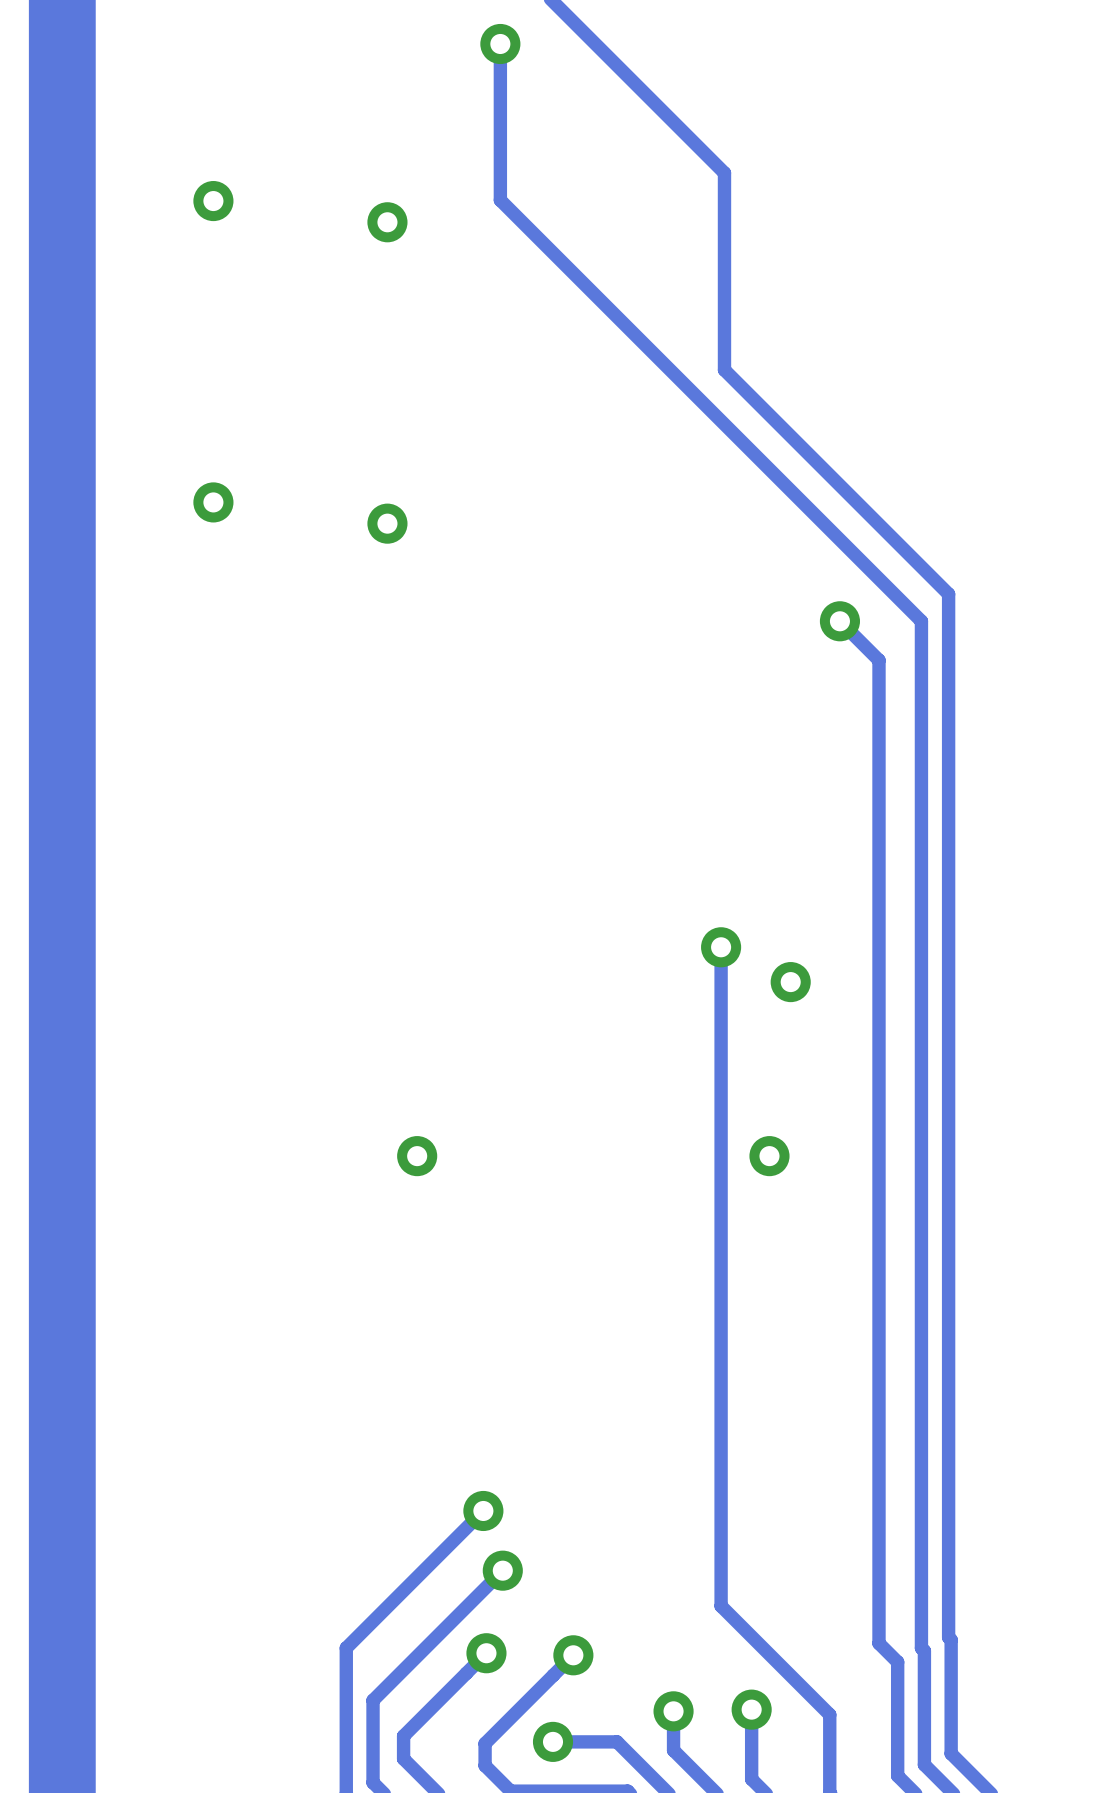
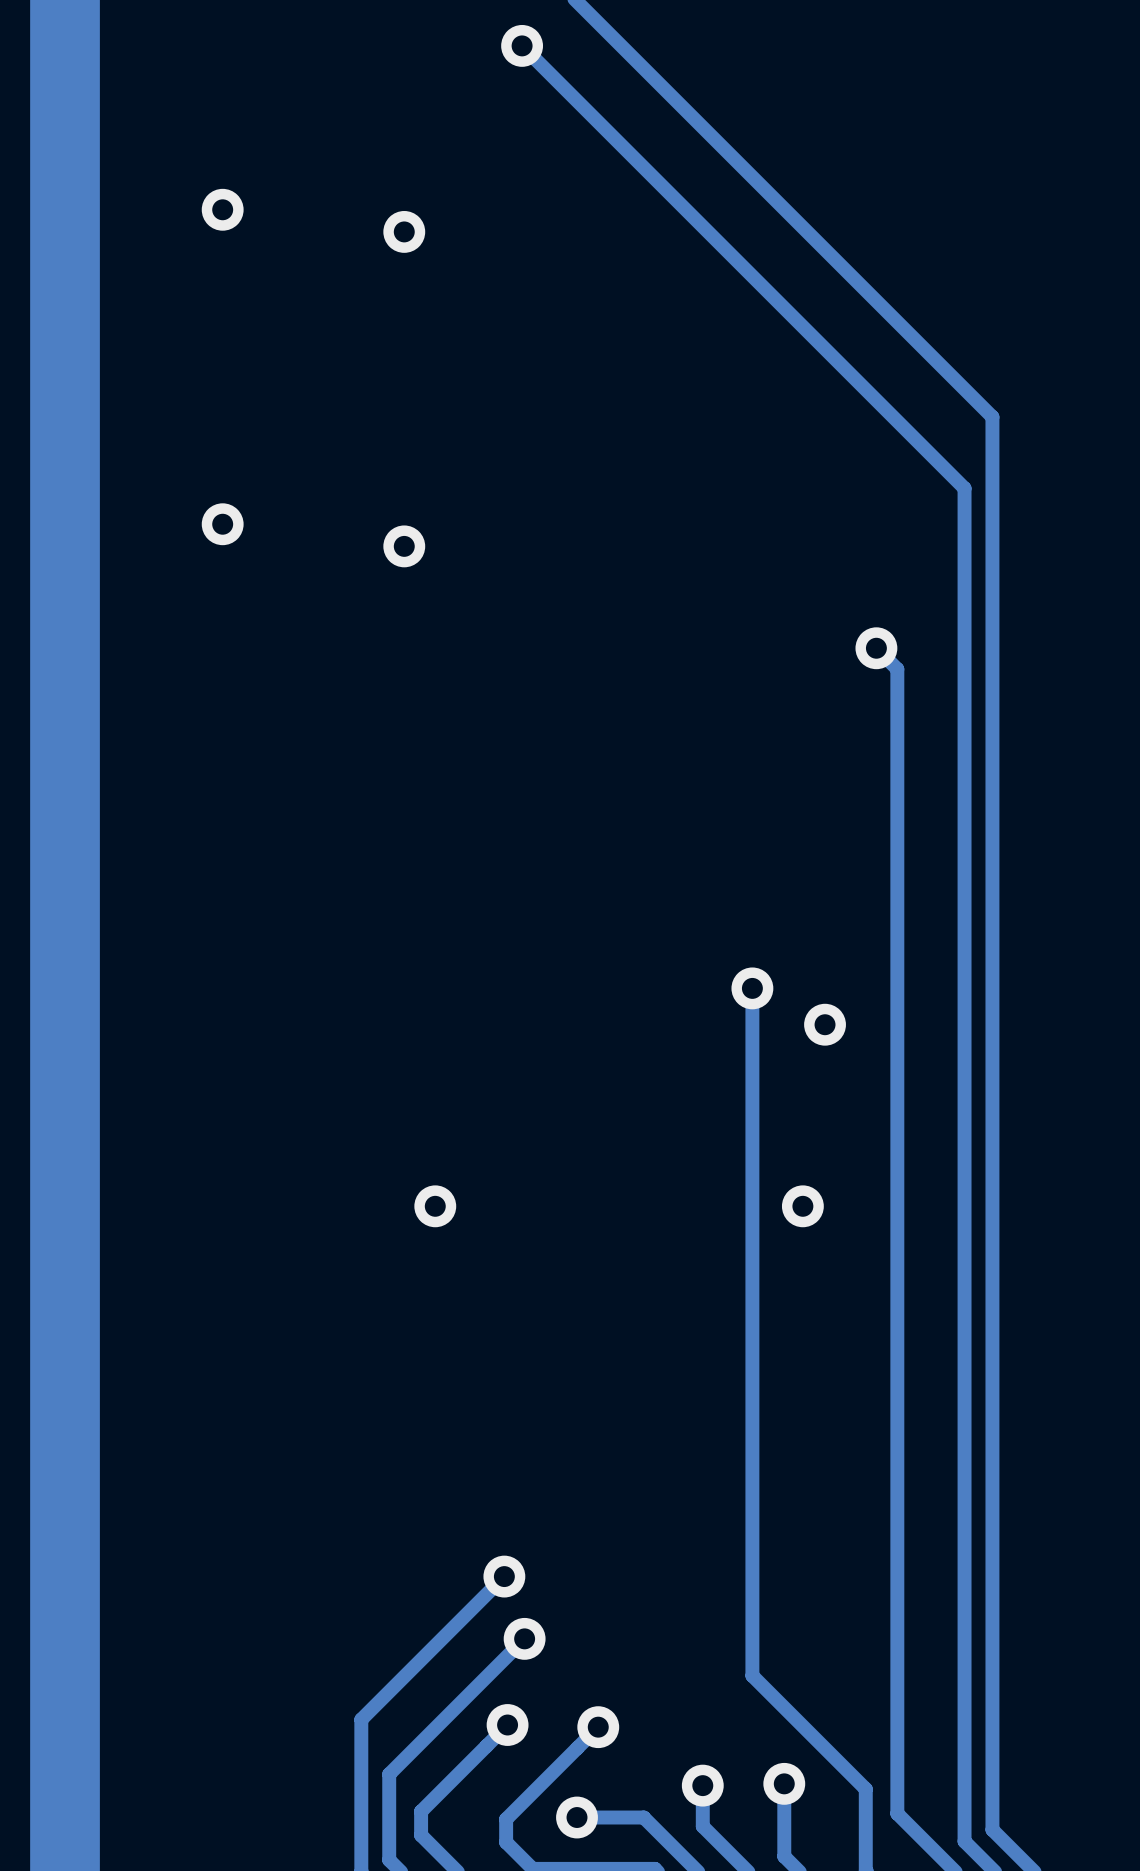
track: (500, 43) (500, 200) (921, 621) (921, 1648) (924, 1651) -> (522, 45) (964, 488) (964, 1722)
track: (724, 173) (724, 369) (948, 594) (948, 1637) (951, 1639) -> (755, 180) (992, 417) (992, 1711)
track: (860, 641) (878, 660) (878, 1643) (897, 1662) (897, 1775) -> (897, 669) (897, 1813) (936, 1852)

